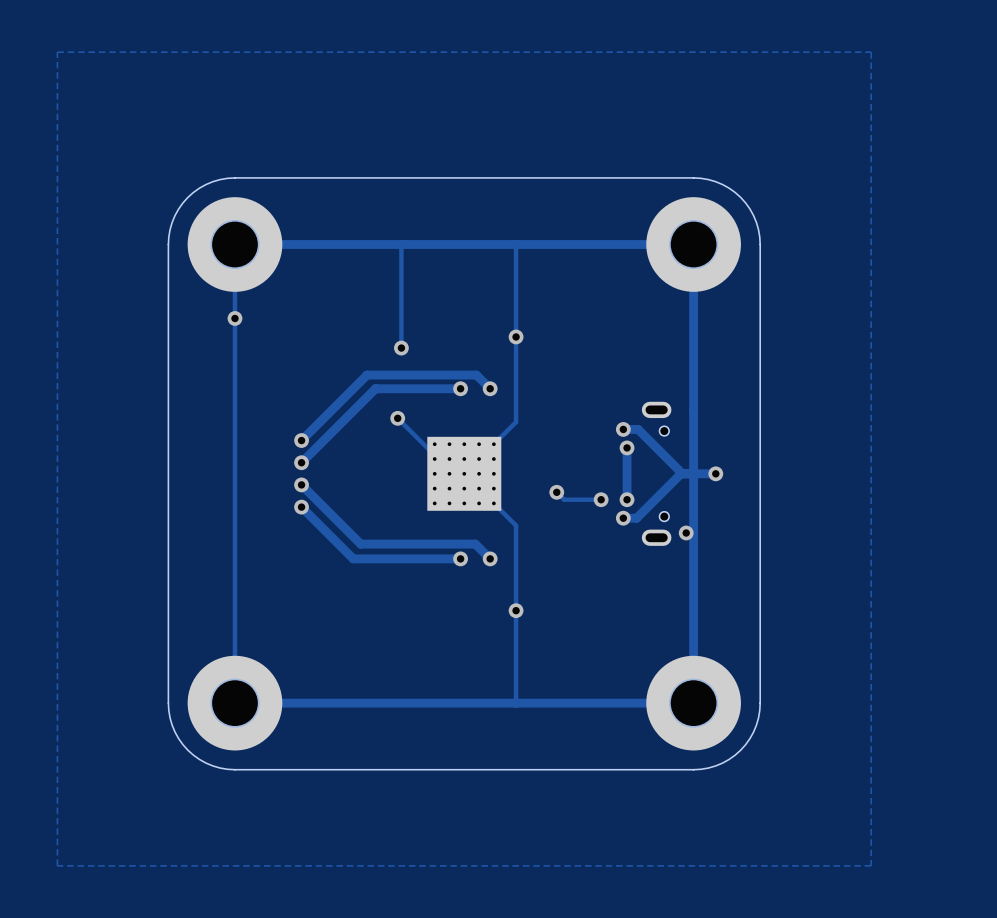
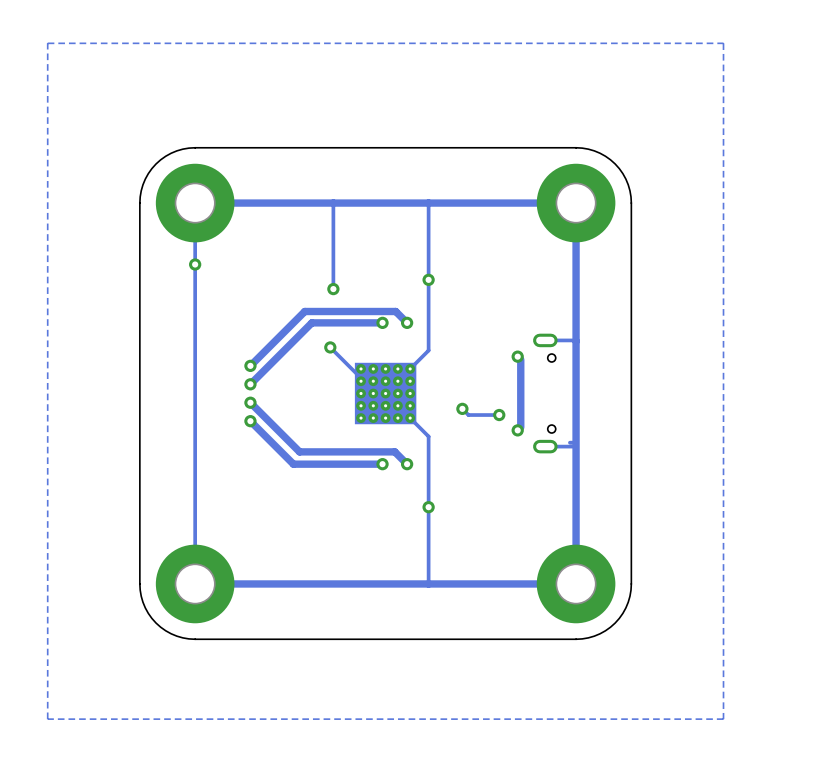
track: none -> (575, 340) (545, 340)
track: (623, 429) (638, 429) (682, 473) -> none
track: none -> (520, 359) (520, 372)
via: (627, 447) -> none
track: (715, 473) (681, 473) (636, 518) (623, 518) -> none
via: (715, 473) -> none
track: none -> (520, 415) (520, 427)
via: (627, 499) -> none
via: (686, 533) -> none
track: none -> (575, 446) (545, 446)

